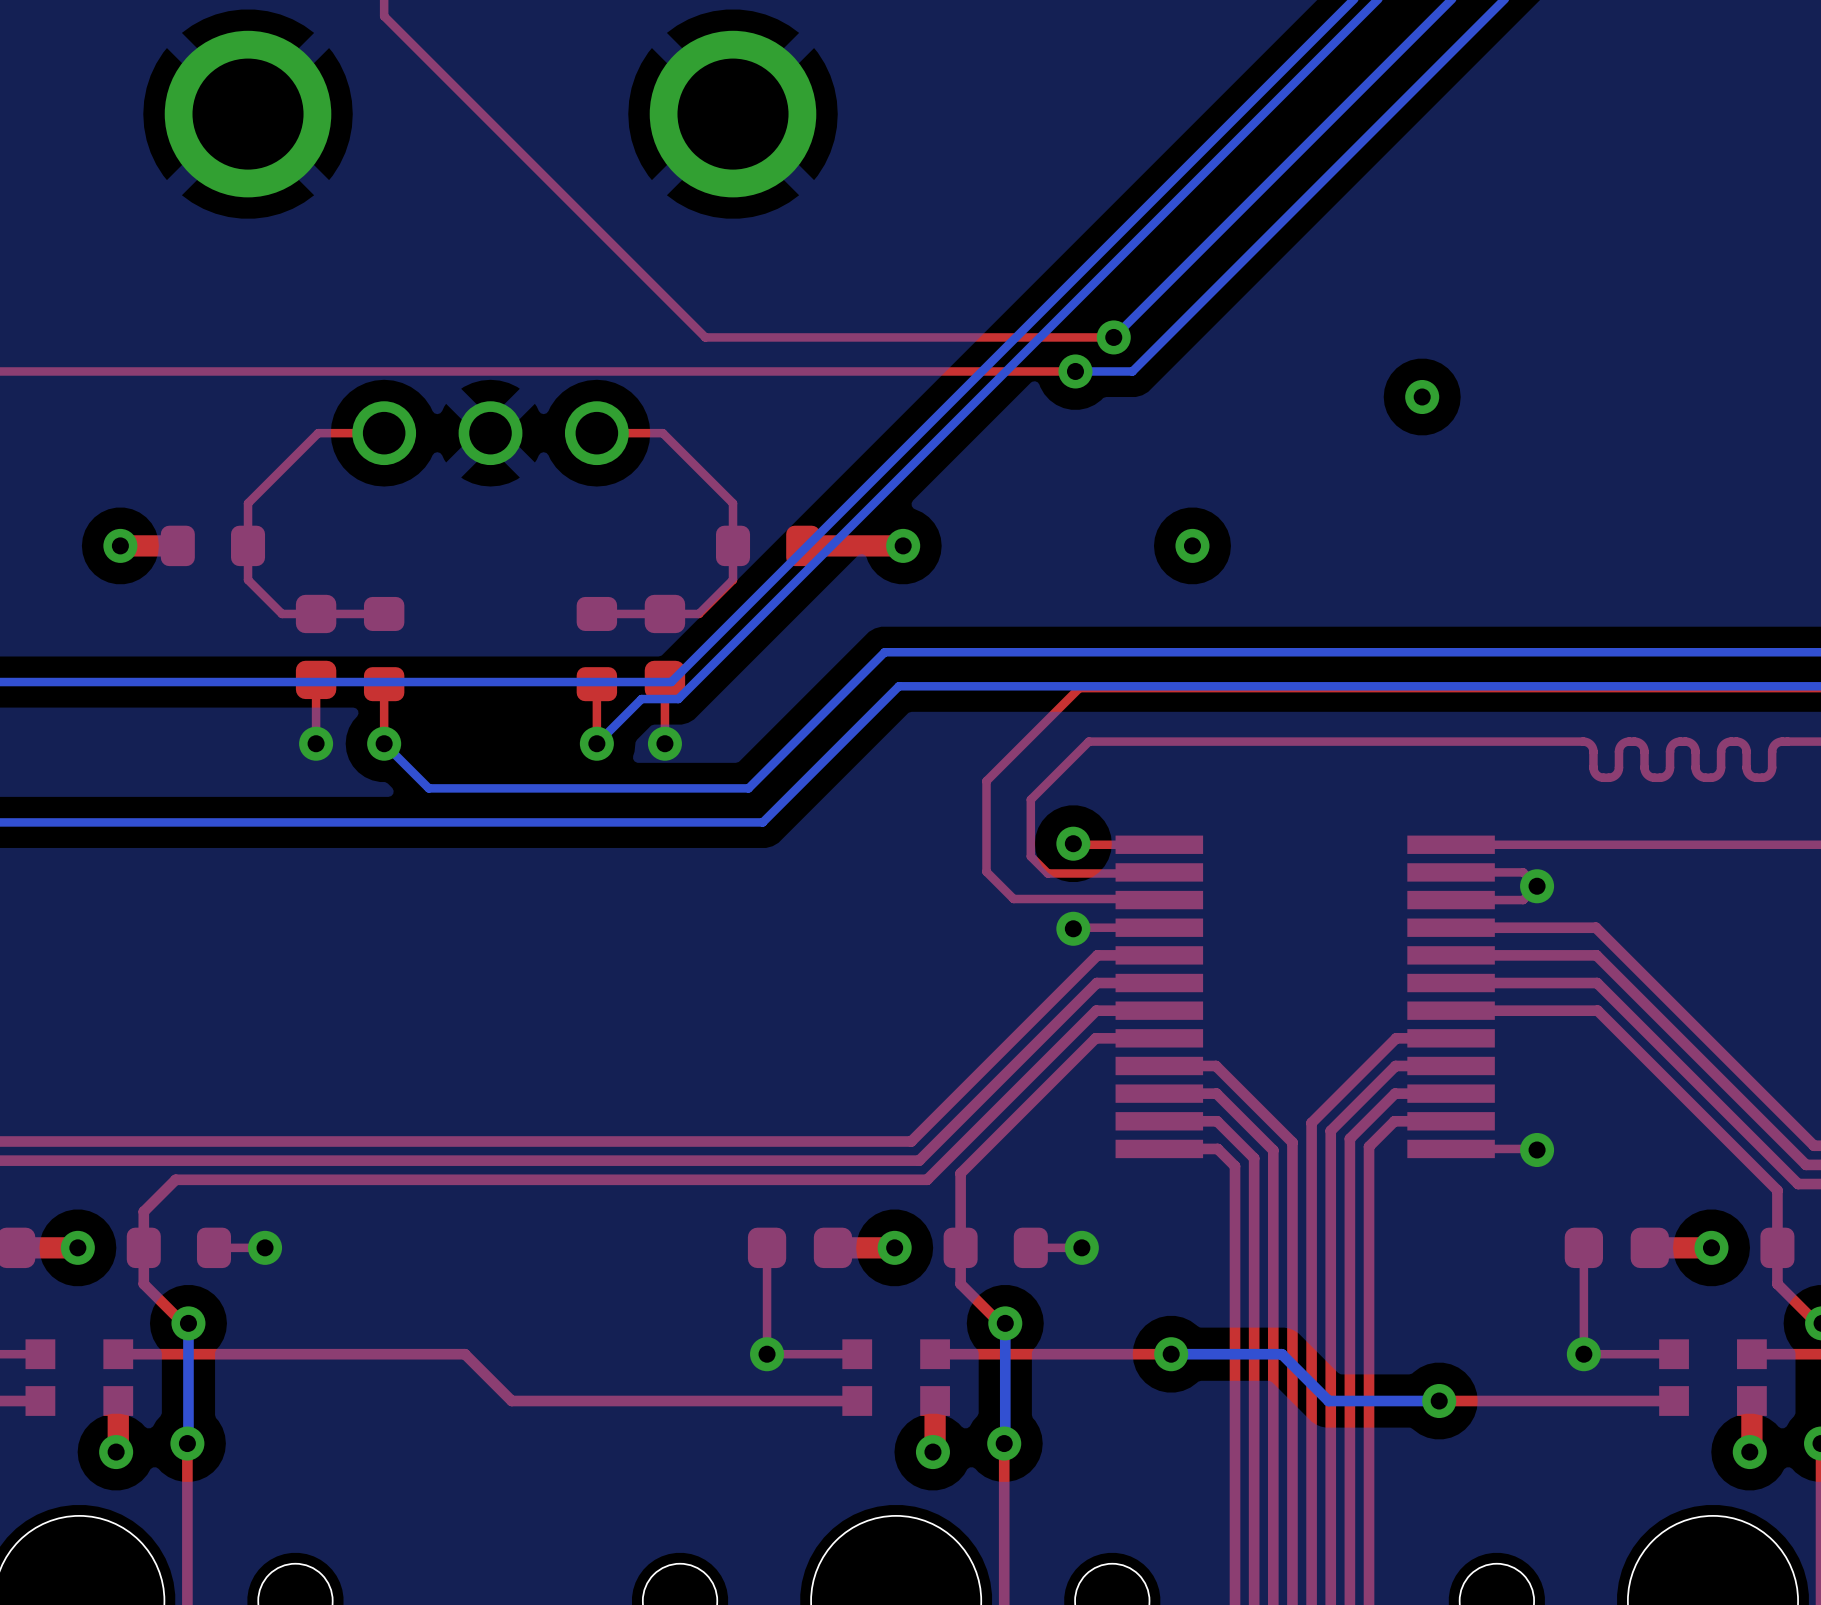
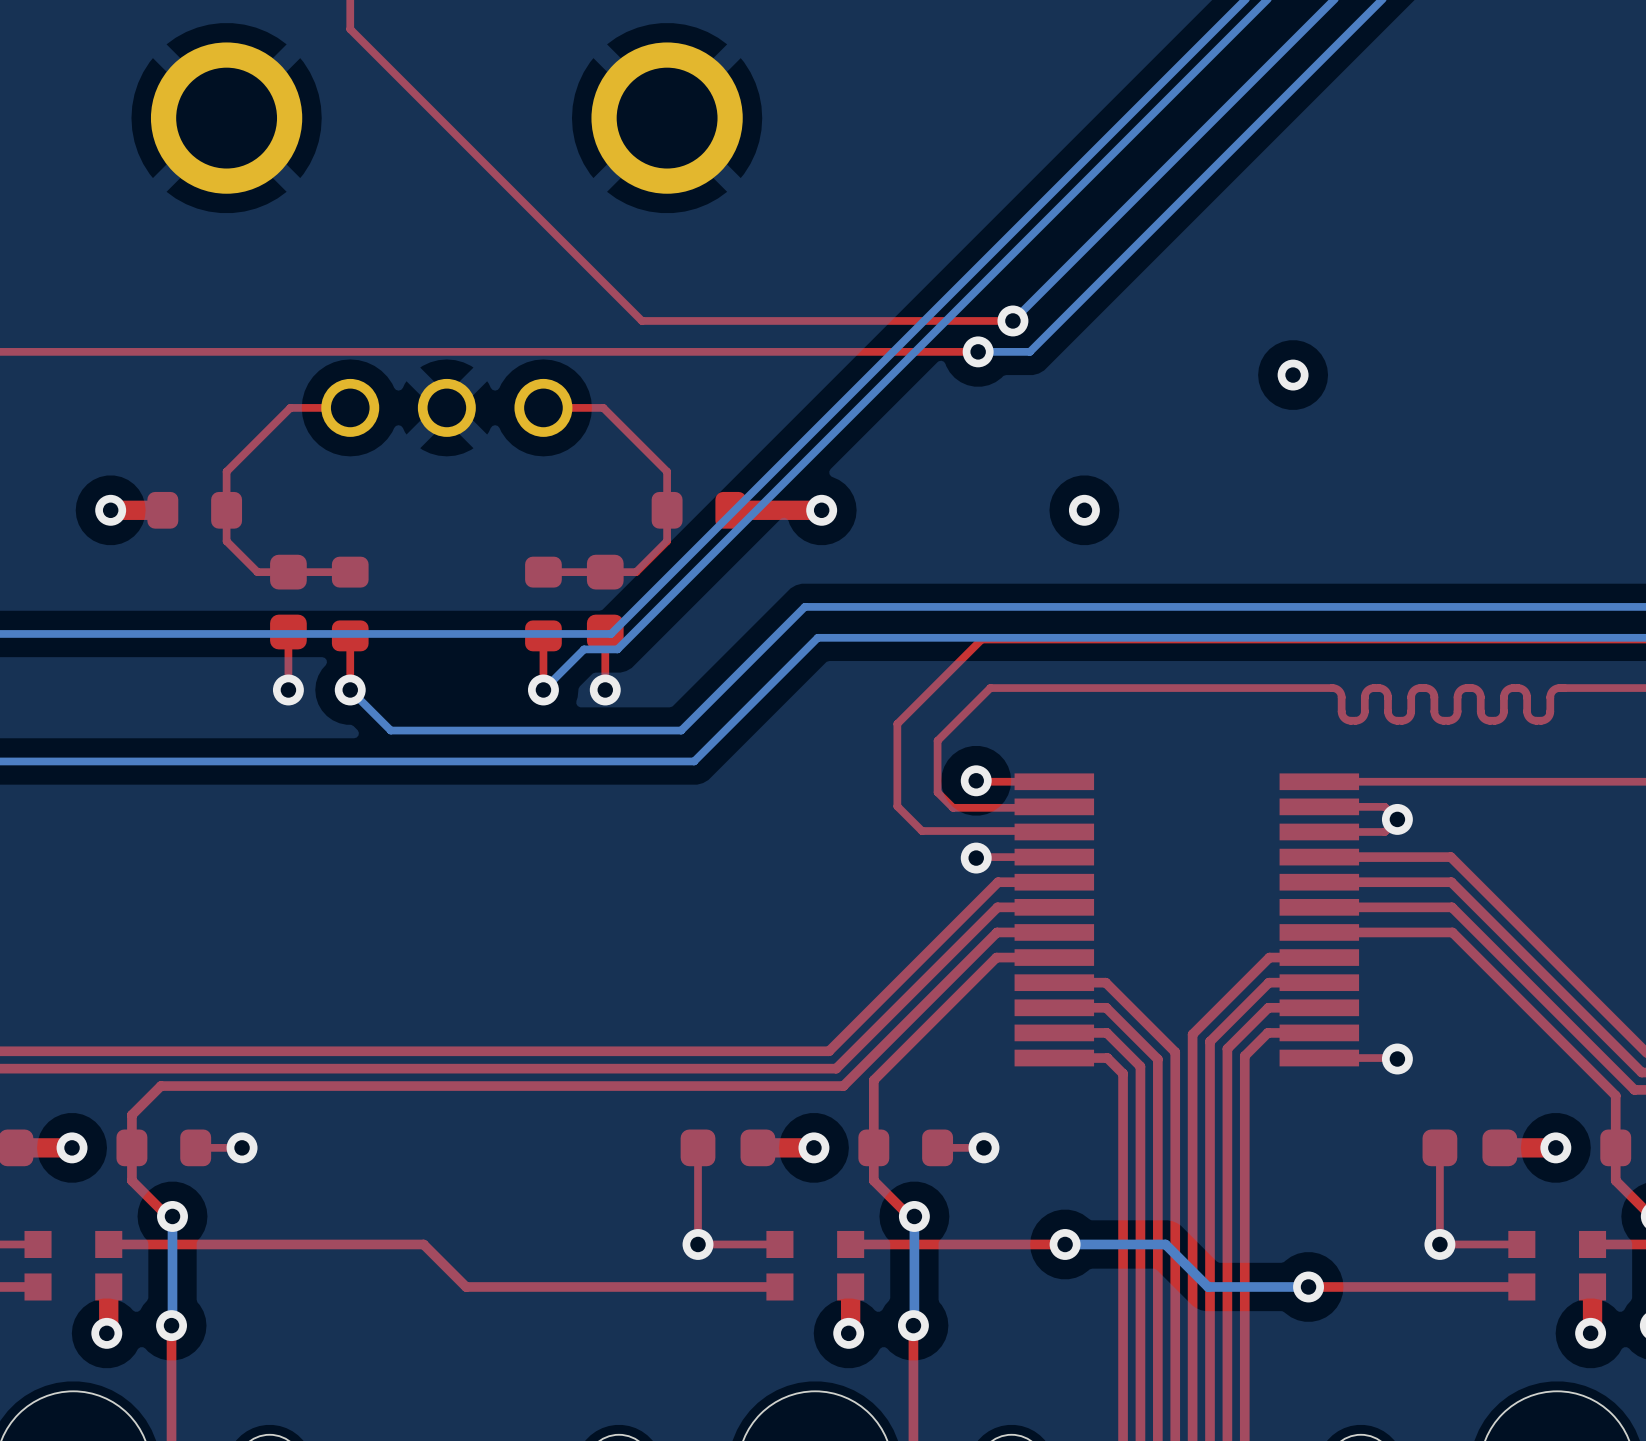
top track: (1511, 741) (1465, 741) -> (1374, 688) (1369, 689) (1365, 694) (1363, 716) (1355, 720) (1347, 720) (1343, 716) (1341, 694) (1337, 689) (1332, 688)
top track: (1562, 741) (1516, 741) -> (1420, 688) (1412, 692) (1410, 714) (1407, 718) (1401, 720) (1394, 720) (1389, 716) (1387, 694) (1383, 689) (1378, 688)
top track: (1731, 741) (1724, 743) (1721, 748) (1719, 772) (1710, 777) (1702, 777) (1697, 772) (1694, 748) (1687, 741) (1677, 741) (1672, 745) (1670, 750) (1669, 770) (1665, 776) (1659, 777) (1651, 777) (1645, 771) (1644, 750) (1641, 744) (1635, 741) (1624, 742) (1619, 749) (1617, 772) (1612, 777) (1603, 777) (1597, 775) (1594, 770) (1593, 750) (1590, 744) (1584, 741) (1567, 741) -> (1573, 688) (1558, 688) (1553, 690) (1550, 696) (1549, 714) (1545, 719) (1541, 720) (1533, 720) (1528, 716) (1526, 694) (1522, 689) (1517, 688) (1510, 688) (1505, 692) (1503, 713) (1498, 719) (1488, 720) (1483, 718) (1480, 712) (1479, 692) (1474, 688) (1466, 688) (1461, 689) (1458, 694) (1455, 717) (1450, 720) (1441, 720) (1434, 714) (1433, 693) (1425, 688)
top track: (1782, 741) (1773, 746) (1771, 770) (1768, 775) (1761, 777) (1753, 777) (1748, 772) (1746, 748) (1741, 743) (1736, 741) -> (1620, 688) (1578, 688)

